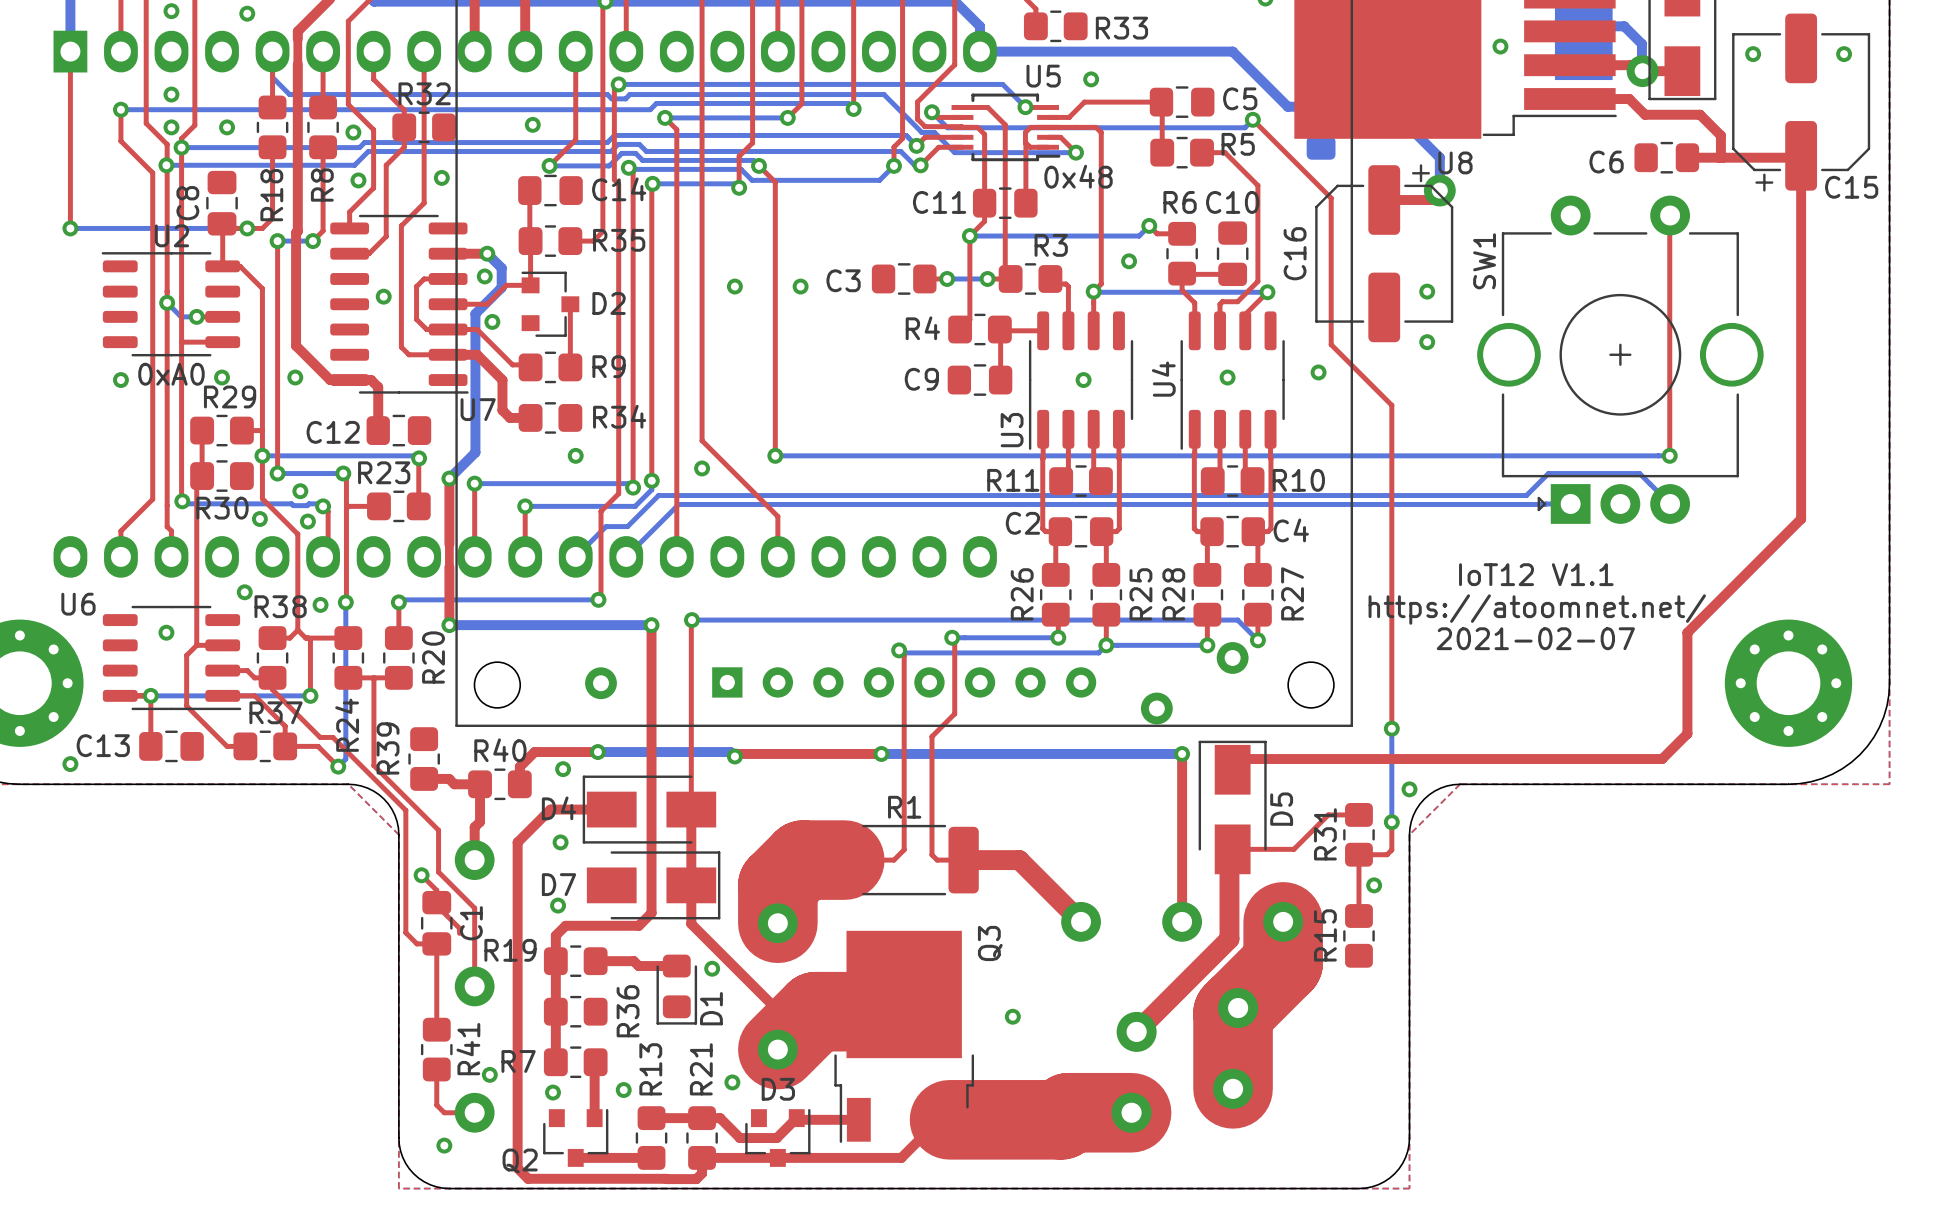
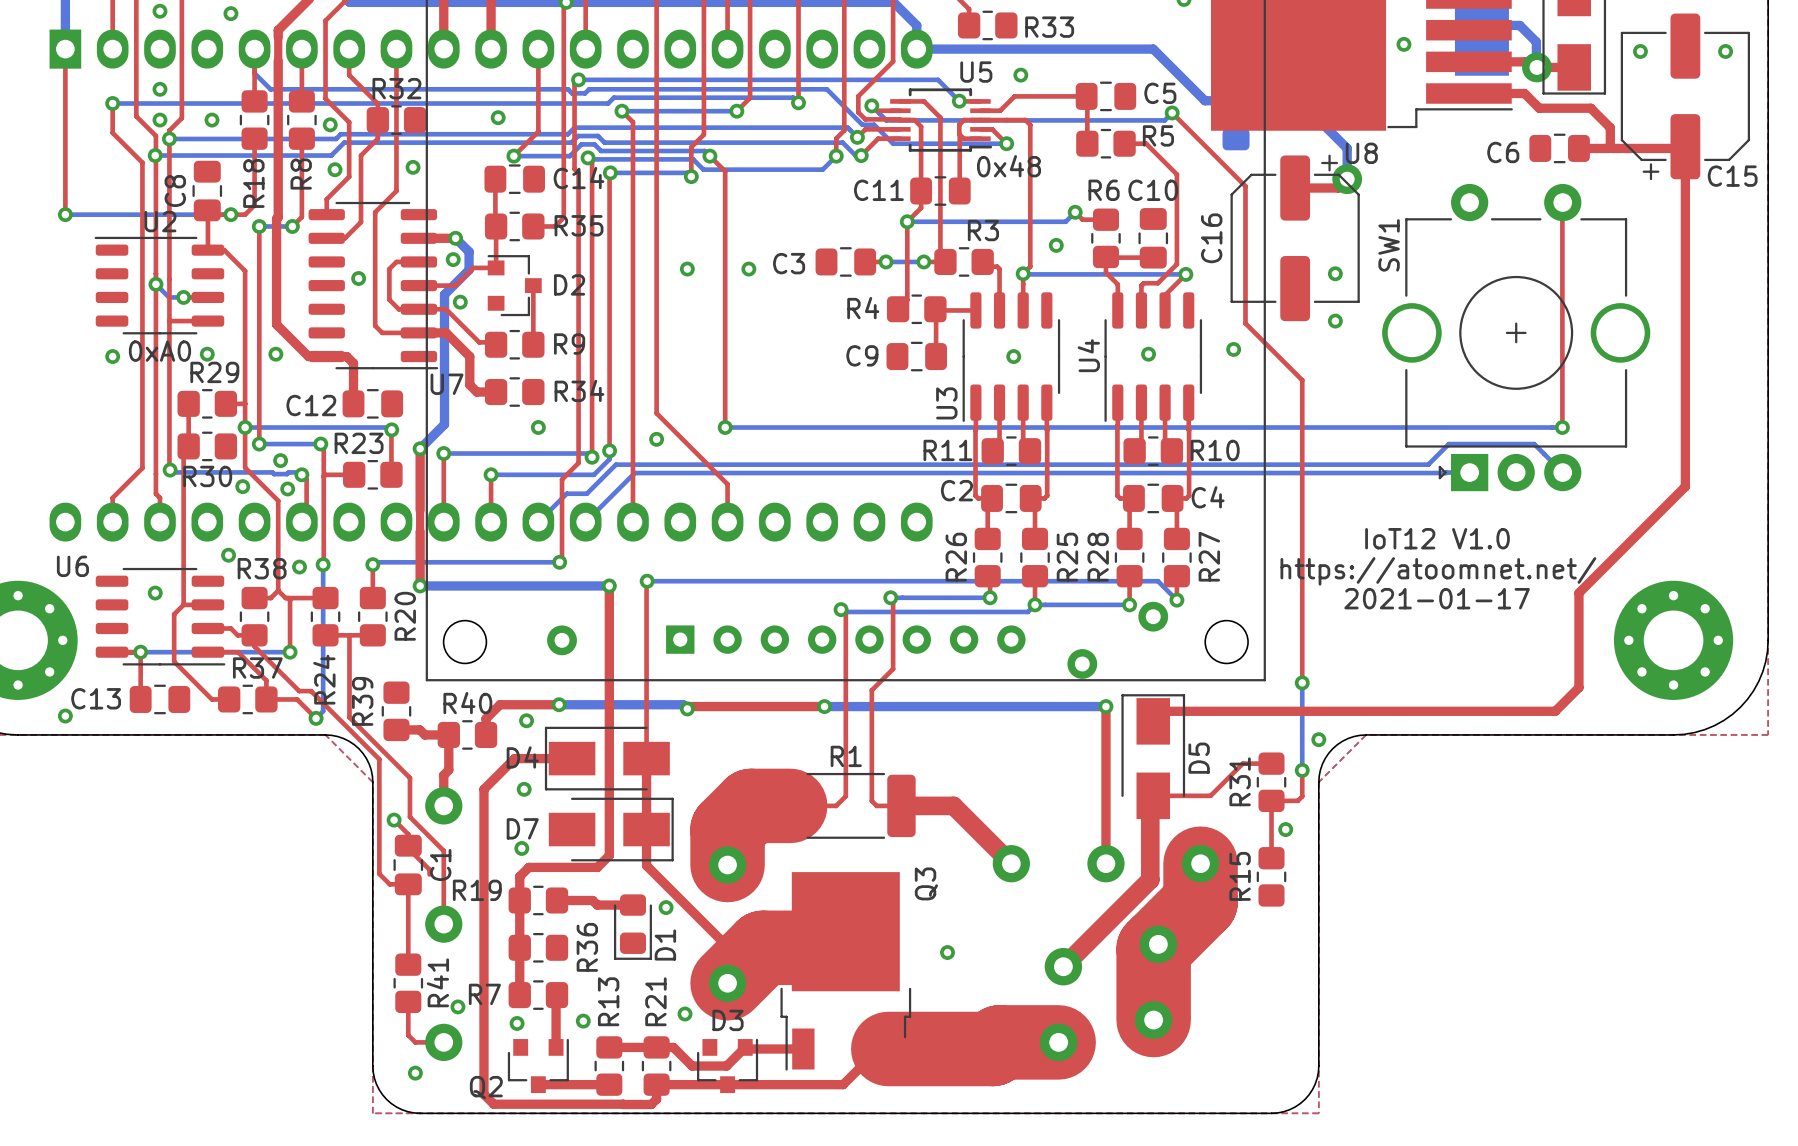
text: IoT12 V1.1 (1536, 574) -> IoT12 V1.0 (1437, 538)
text: 2021-02-07 (1535, 638) -> 2021-01-17 (1437, 598)

